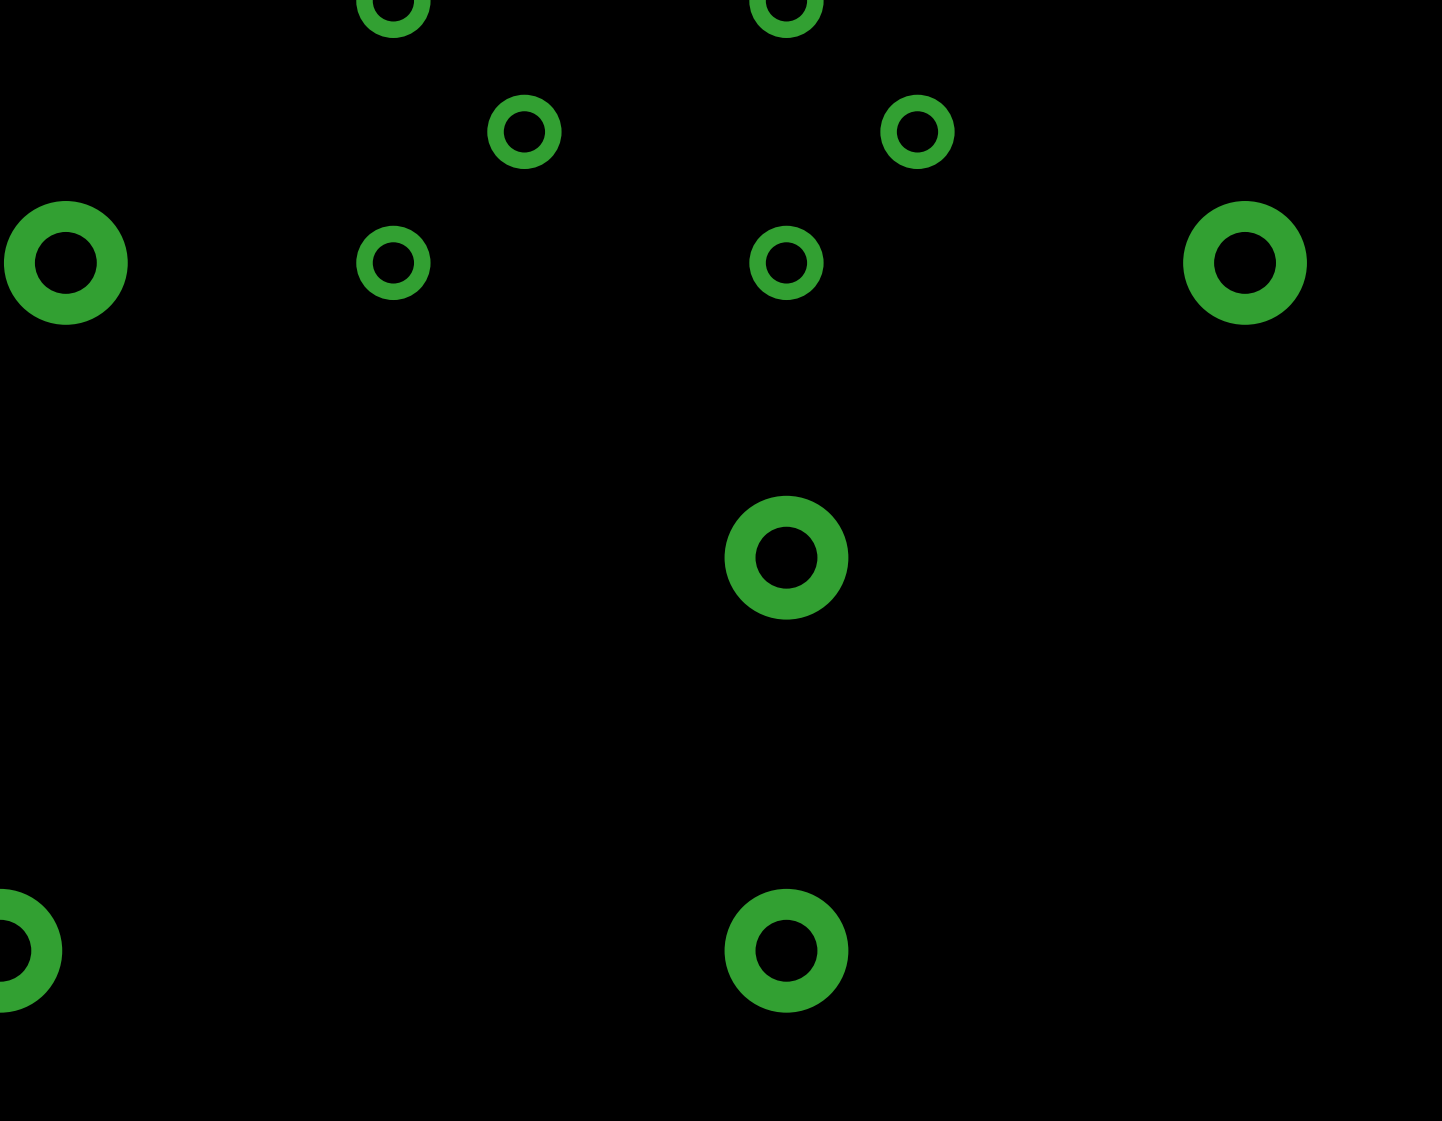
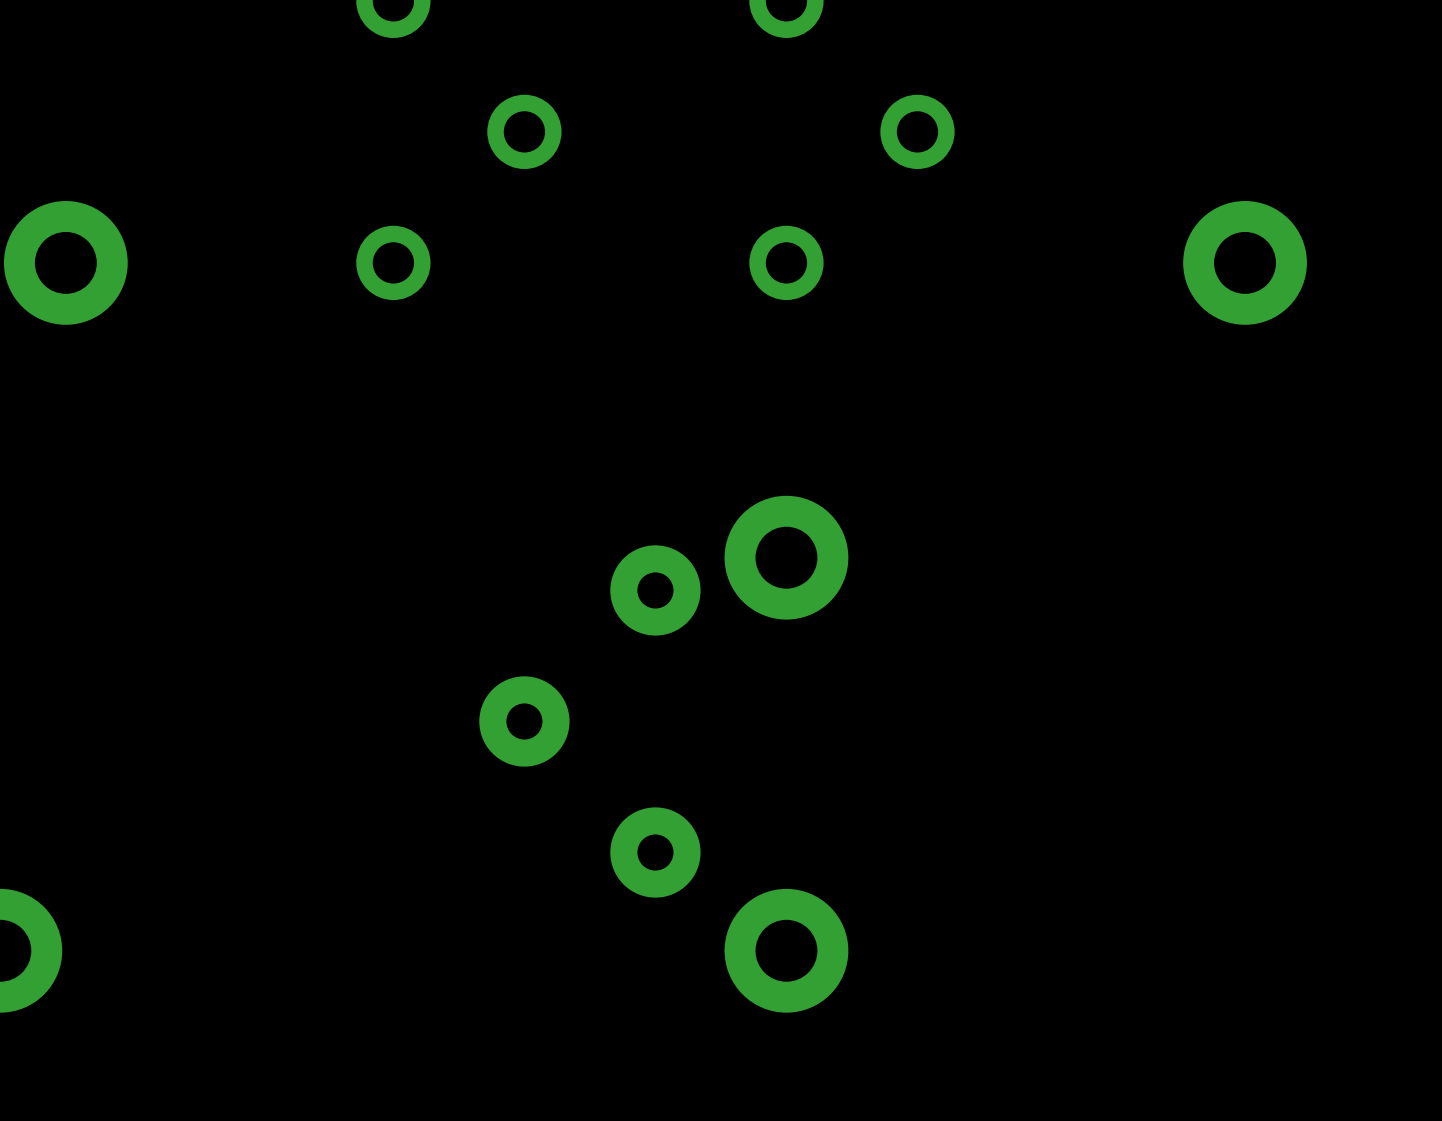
part: none -> (589, 721)

